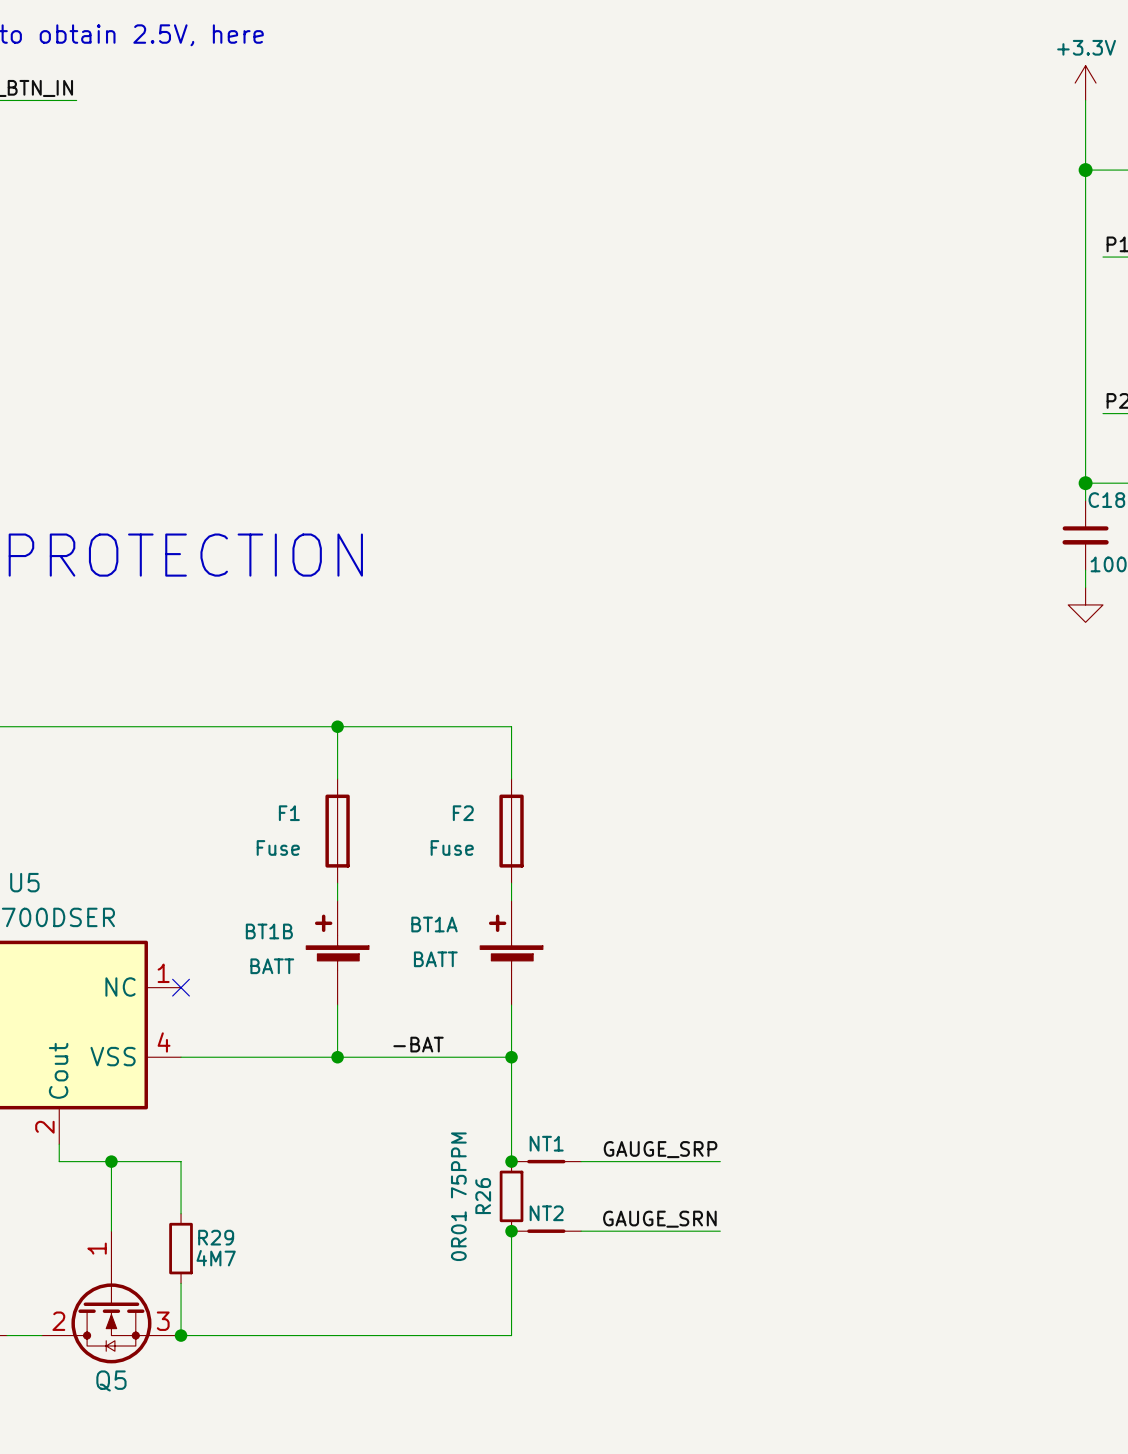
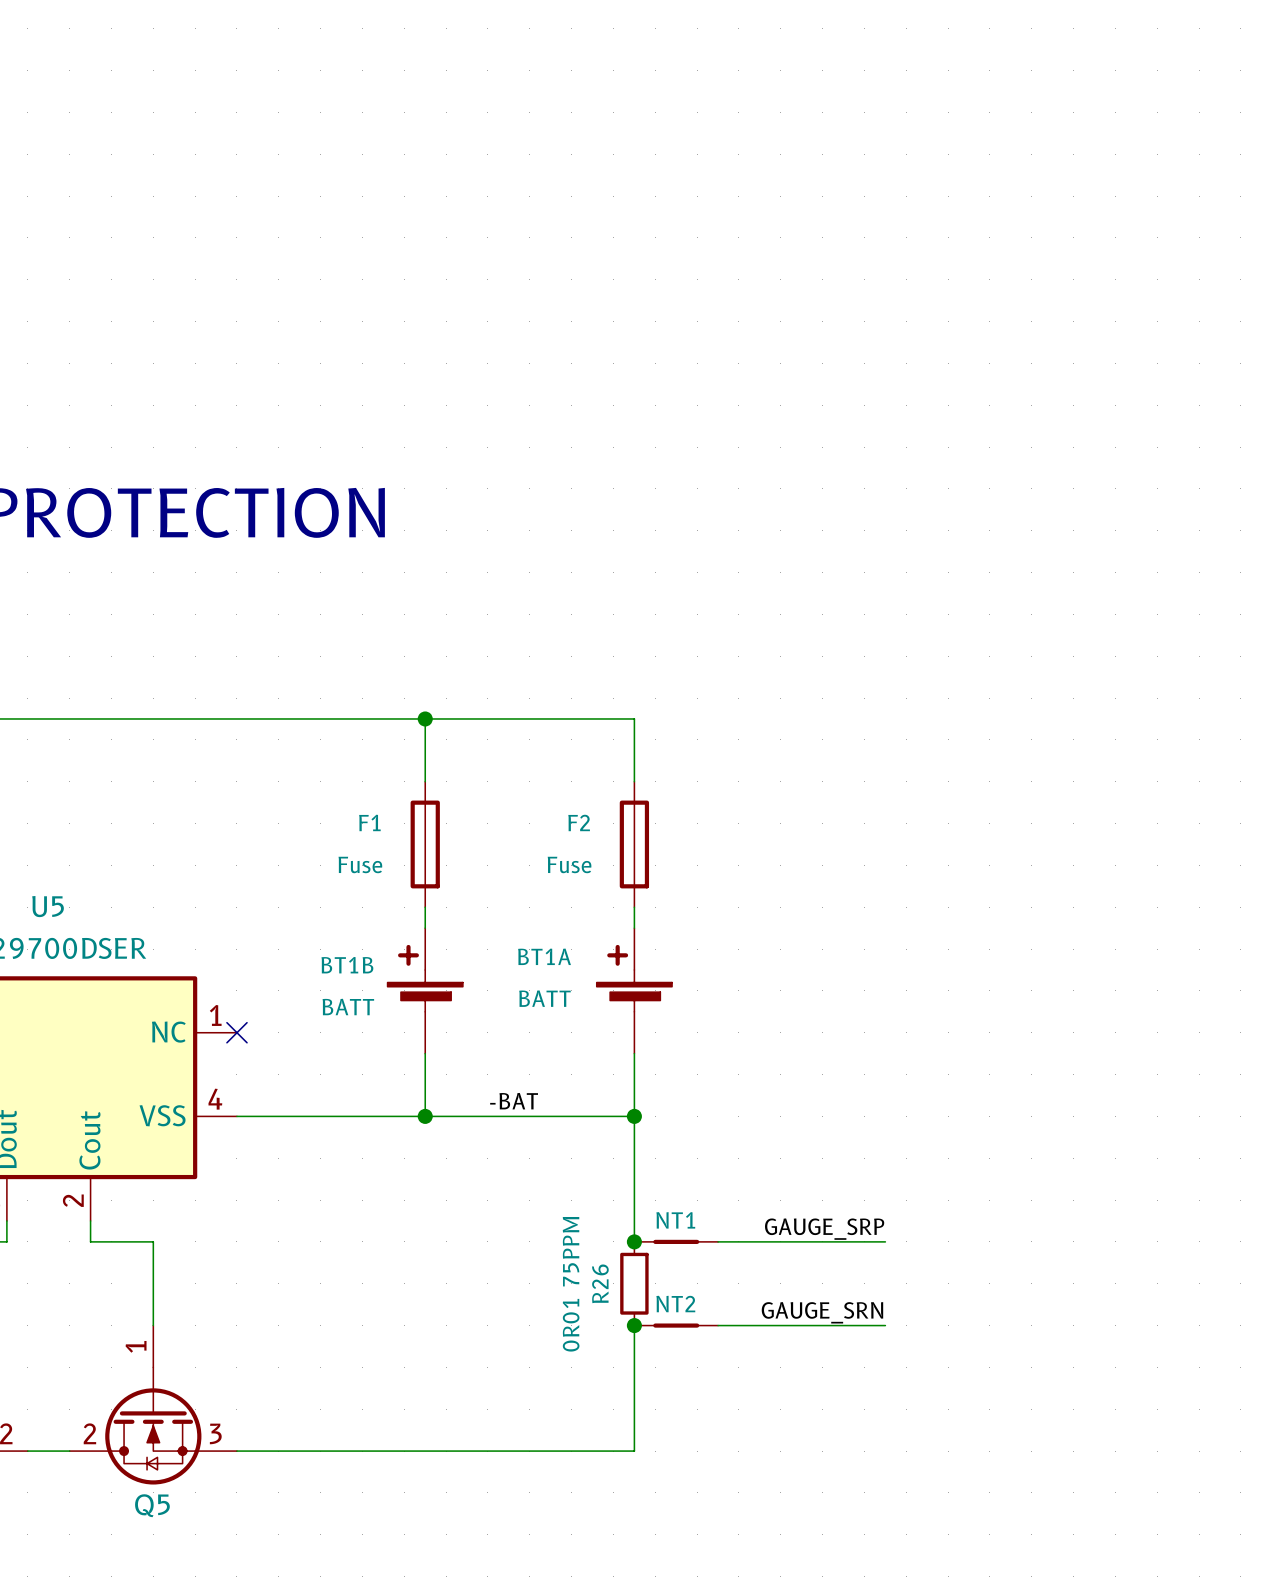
wire: (111, 1161) (181, 1161) (181, 1213) -> none
junction: (111, 1161) -> none
R29: 4M7 (181, 1248) -> none
wire: (181, 1283) (181, 1335) -> none
junction: (181, 1335) -> none

